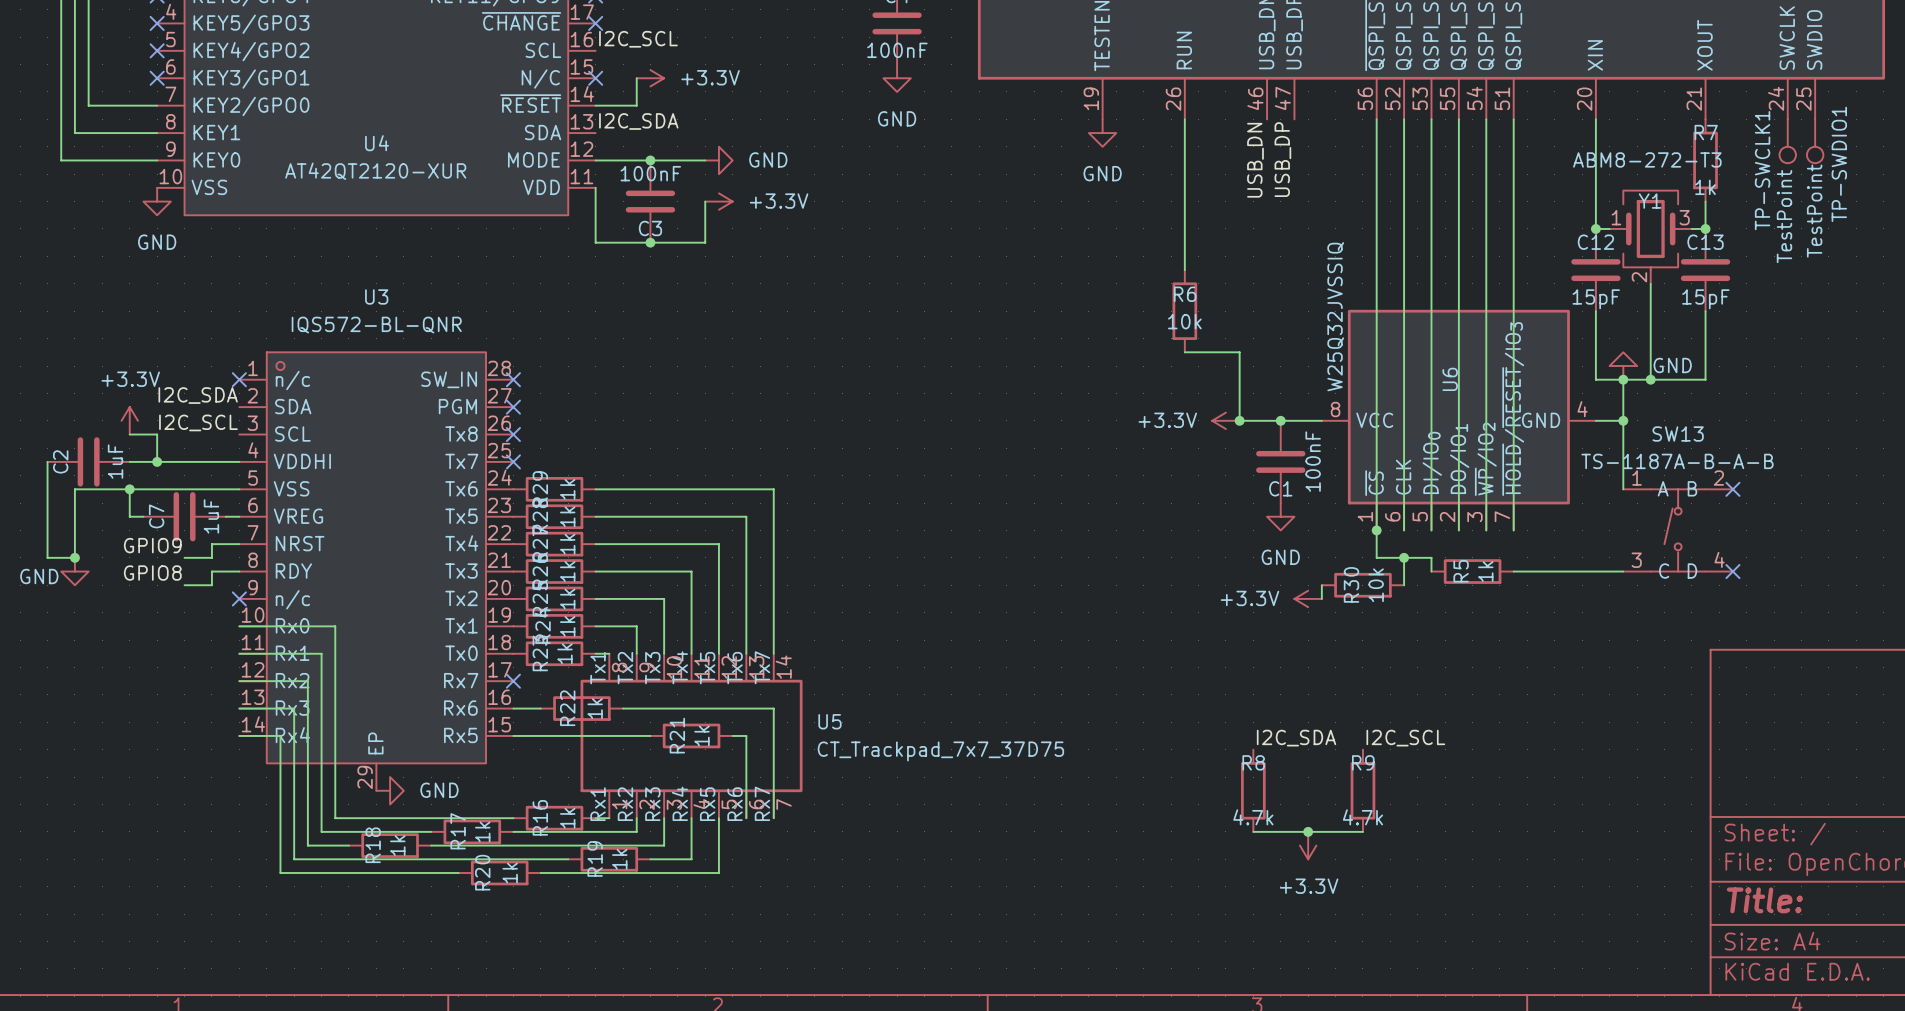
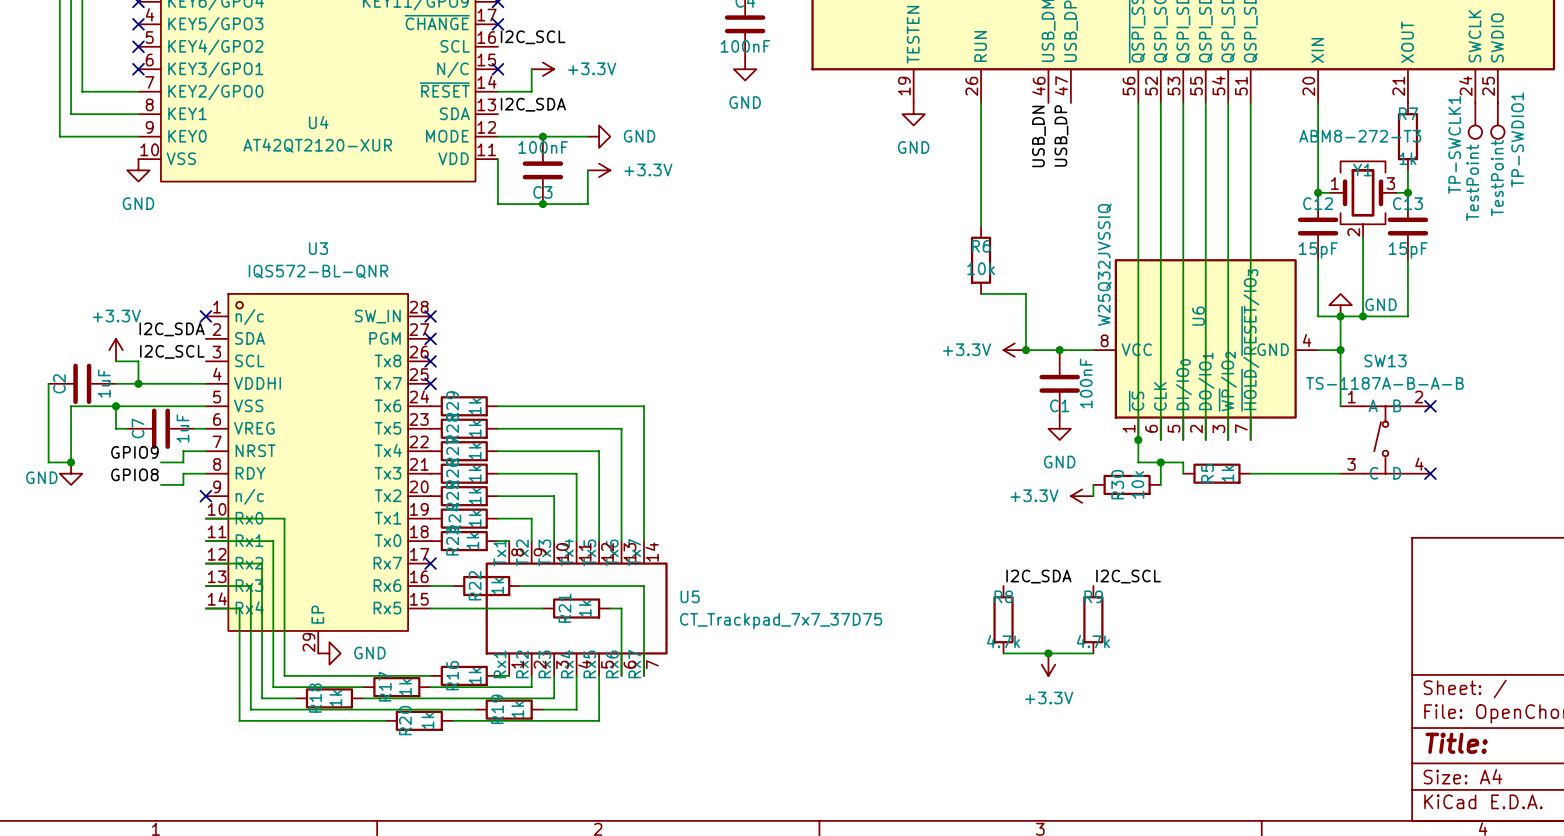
label position: I2C_SDA (1296, 738) -> I2C_SDA (1038, 576)
label position: I2C_SCL (1405, 738) -> I2C_SCL (1128, 576)
R8 position: (1253, 790) -> (1003, 619)
R9 position: (1362, 790) -> (1093, 619)
wire: (1253, 831) (1362, 831) -> (1003, 653) (1093, 653)
junction position: (1308, 831) -> (1048, 653)
power symbol position: +3.3V (1308, 845) -> +3.3V (1048, 664)

